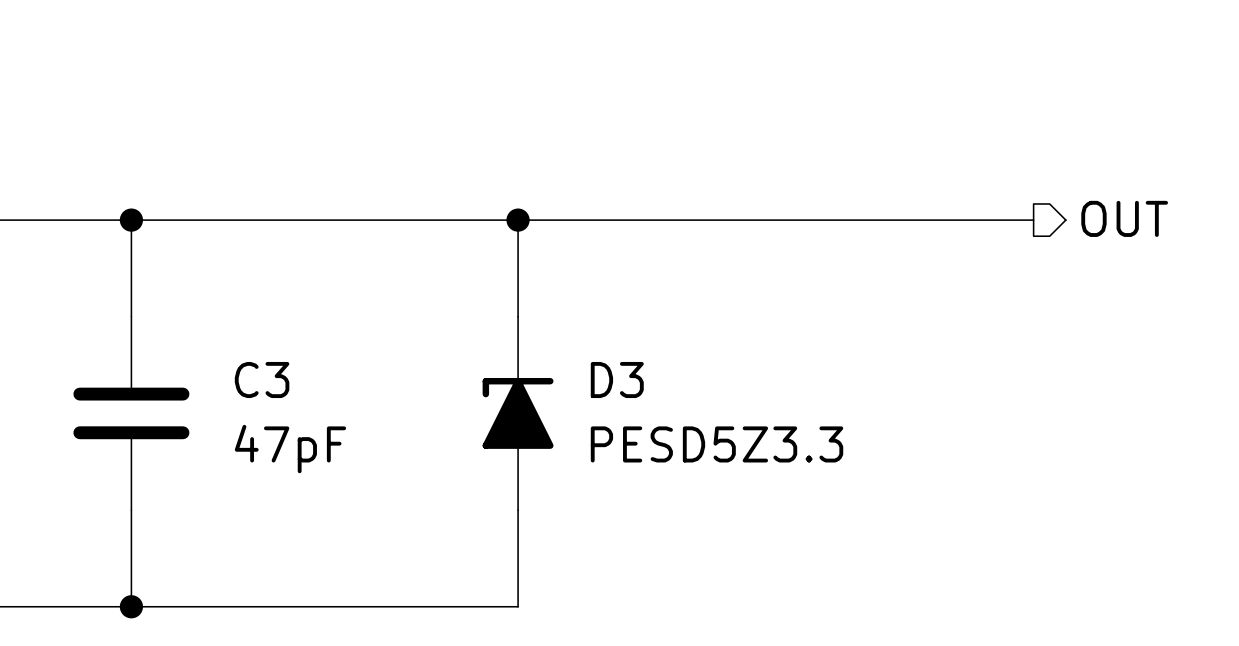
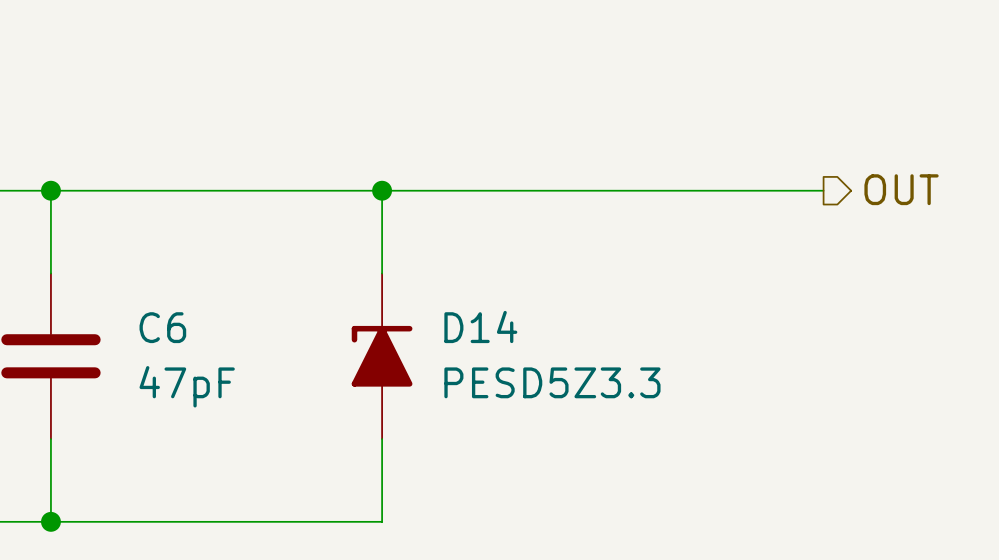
C3 name: C3 (262, 380) -> C6 (162, 327)
D3 name: D3 (617, 380) -> D14 (480, 327)

